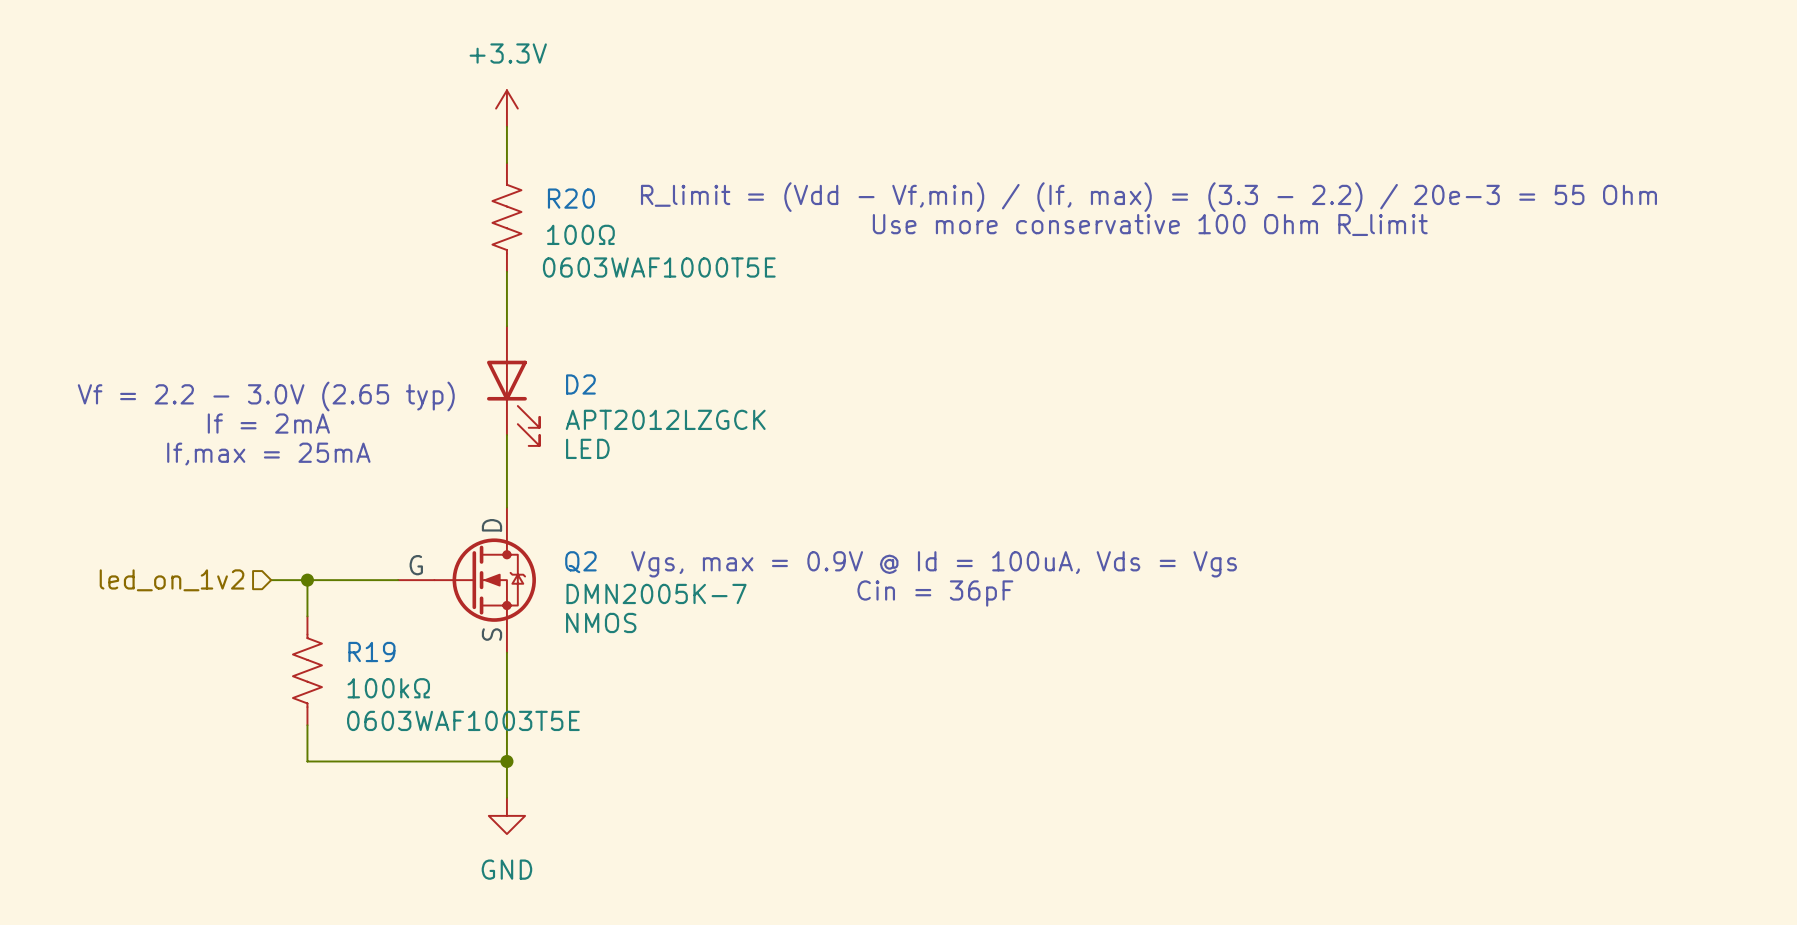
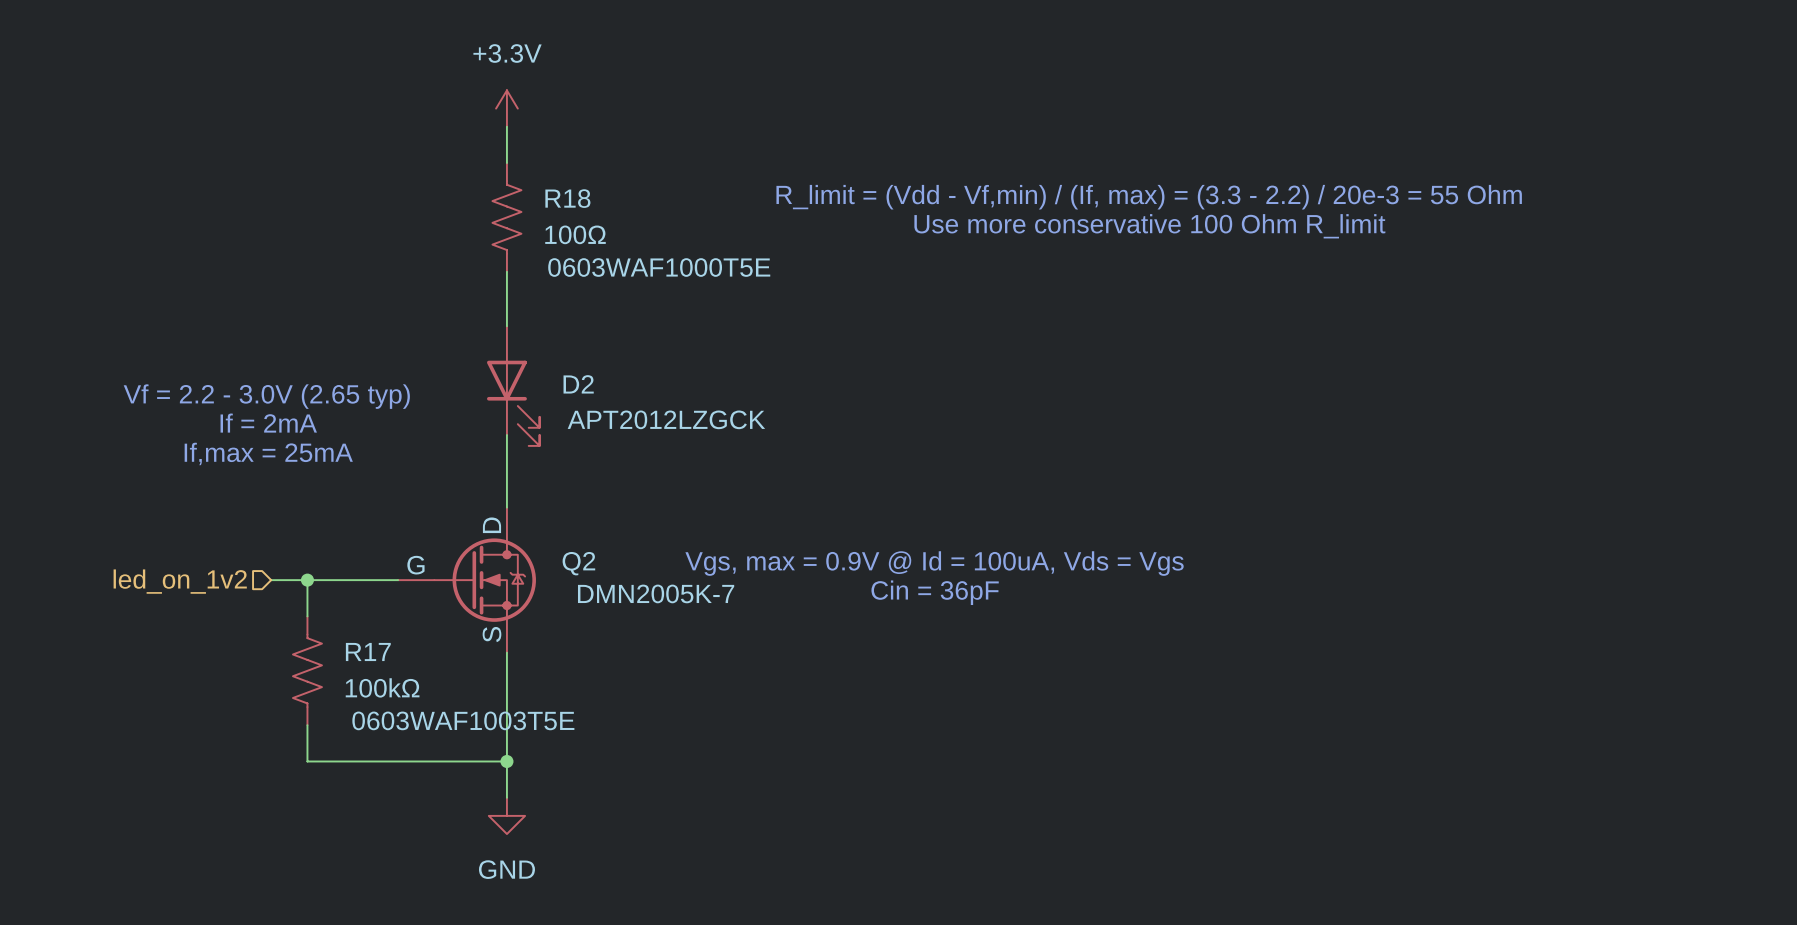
R20 name: R20 (571, 198) -> R18 (567, 198)
D2 value: LED (587, 448) -> none
Q2 value: NMOS (601, 622) -> none
R19 name: R19 (371, 651) -> R17 (368, 651)

